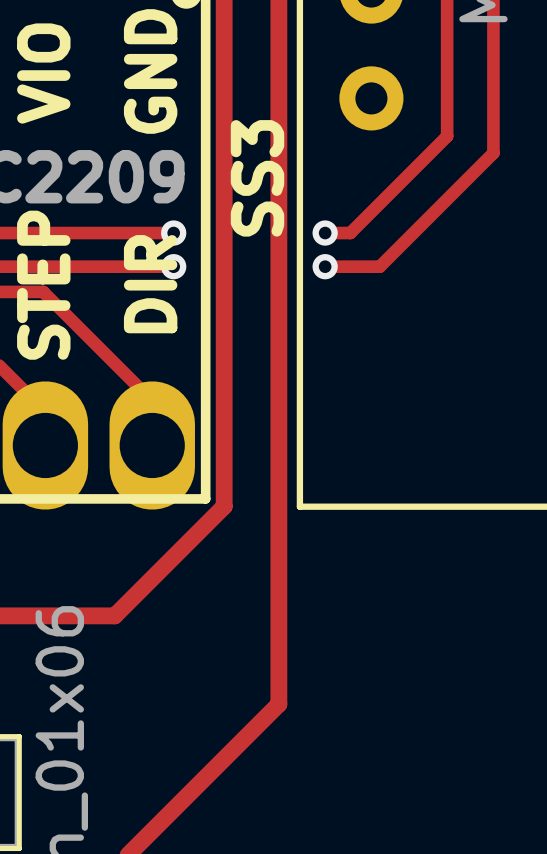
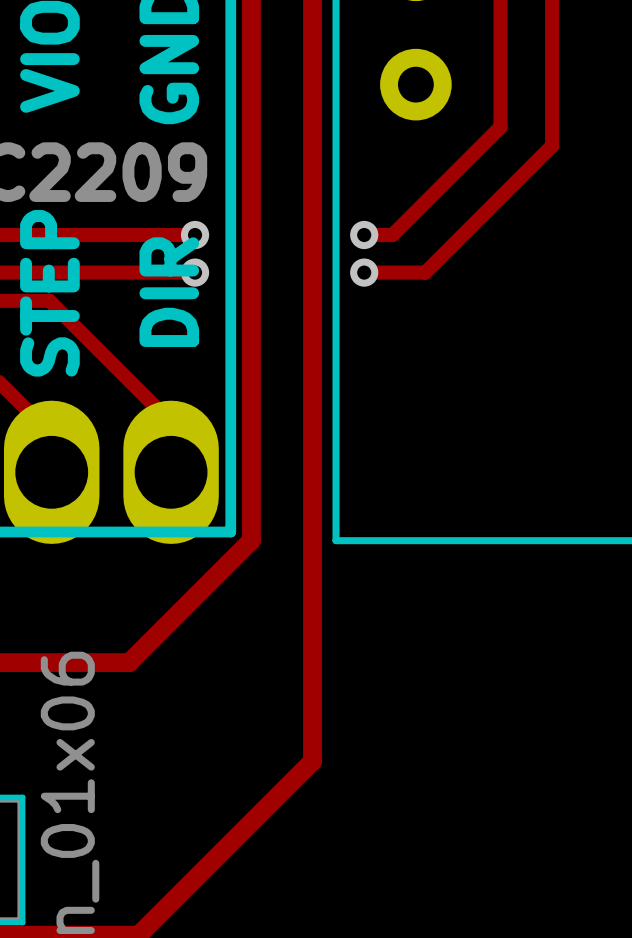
SS3 name: SS3 (257, 178) -> none

